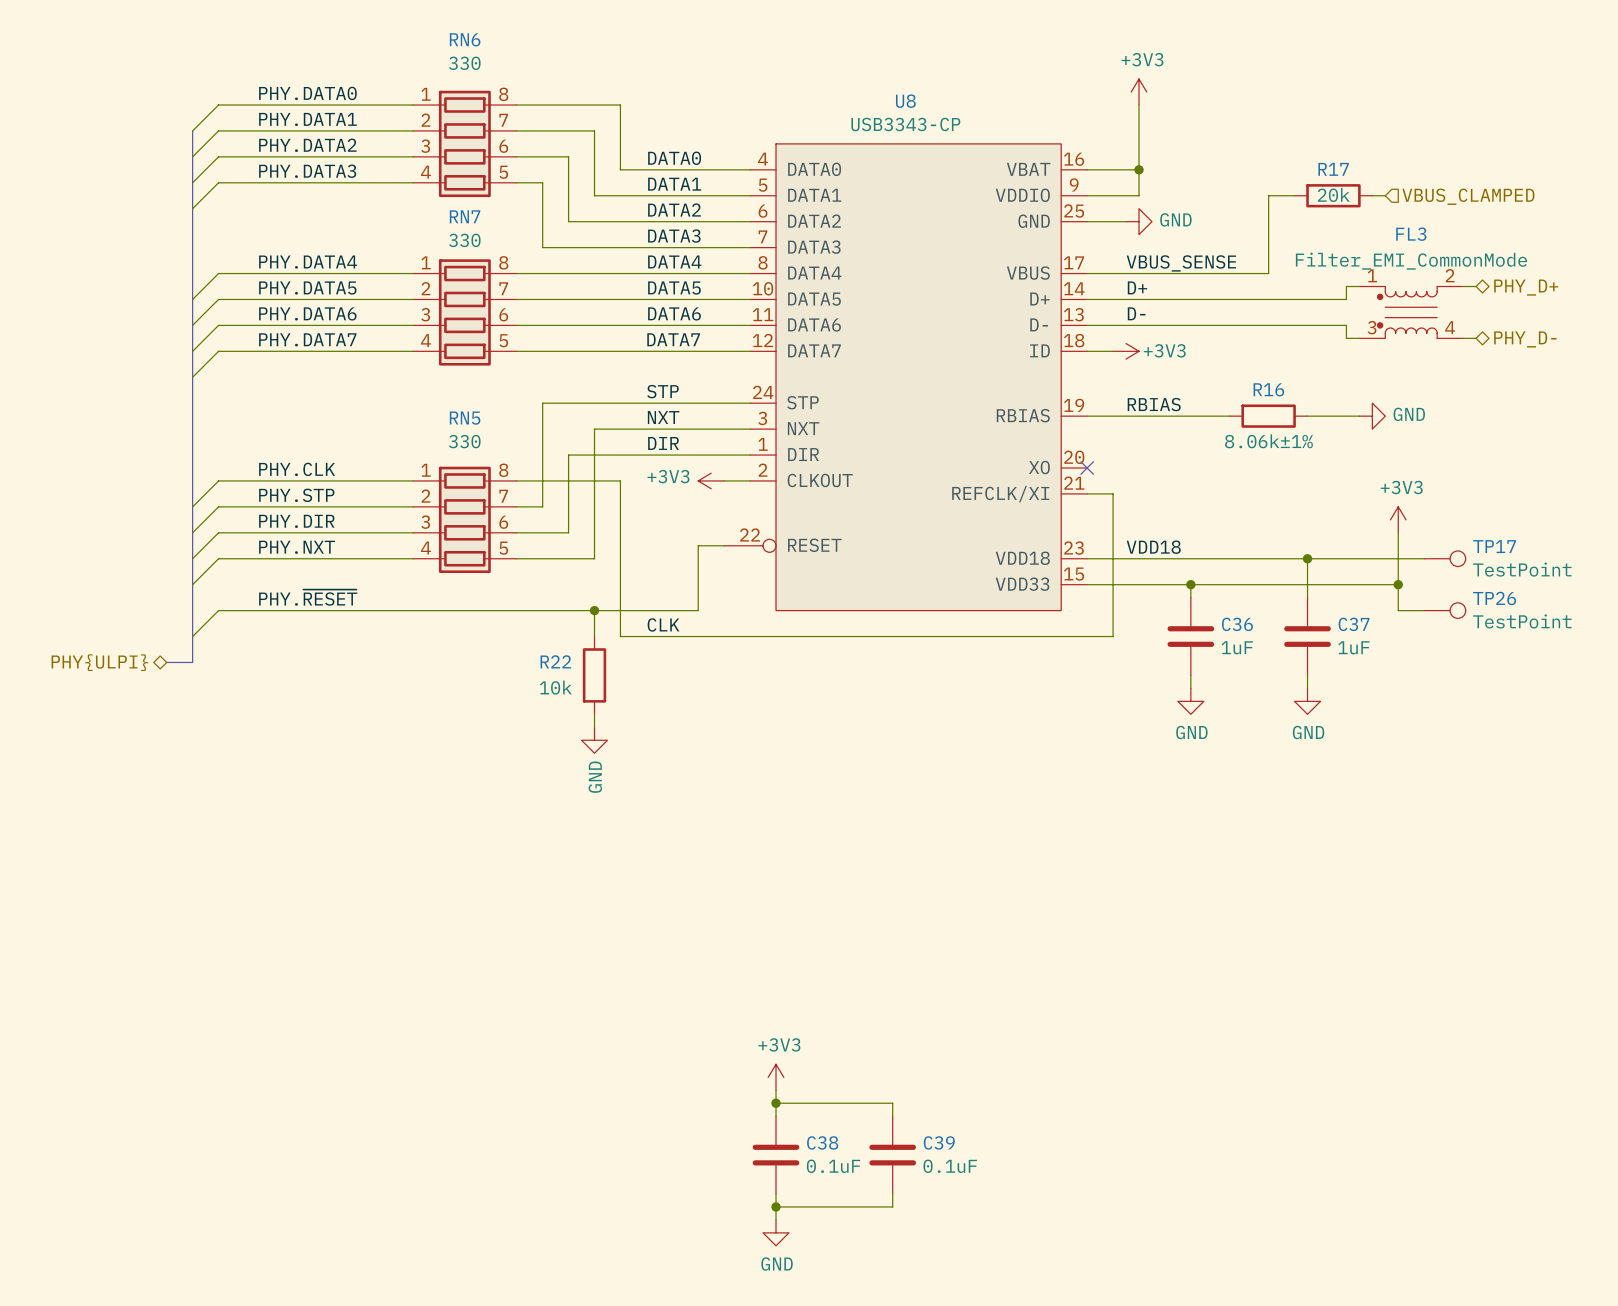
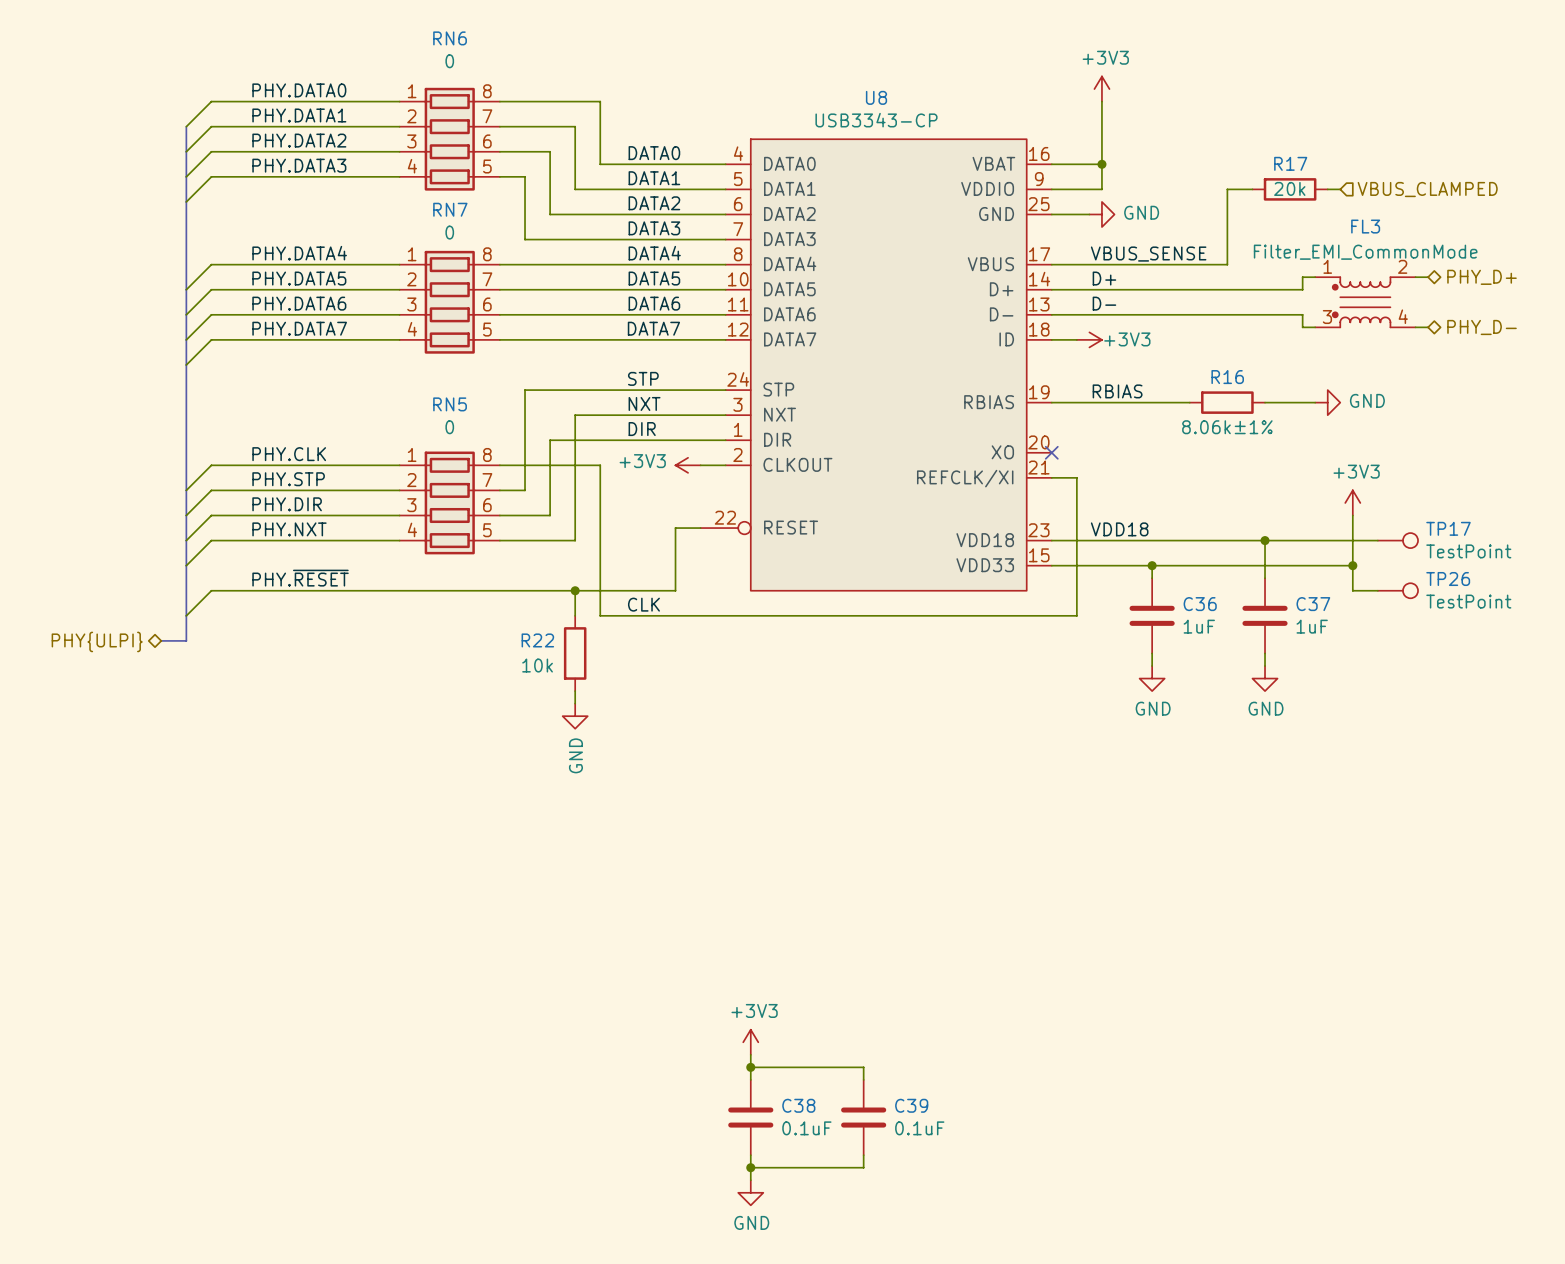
RN6 value: 330 (464, 63) -> 0 (449, 61)
RN7 value: 330 (464, 240) -> 0 (449, 232)
RN5 value: 330 (464, 441) -> 0 (449, 427)

